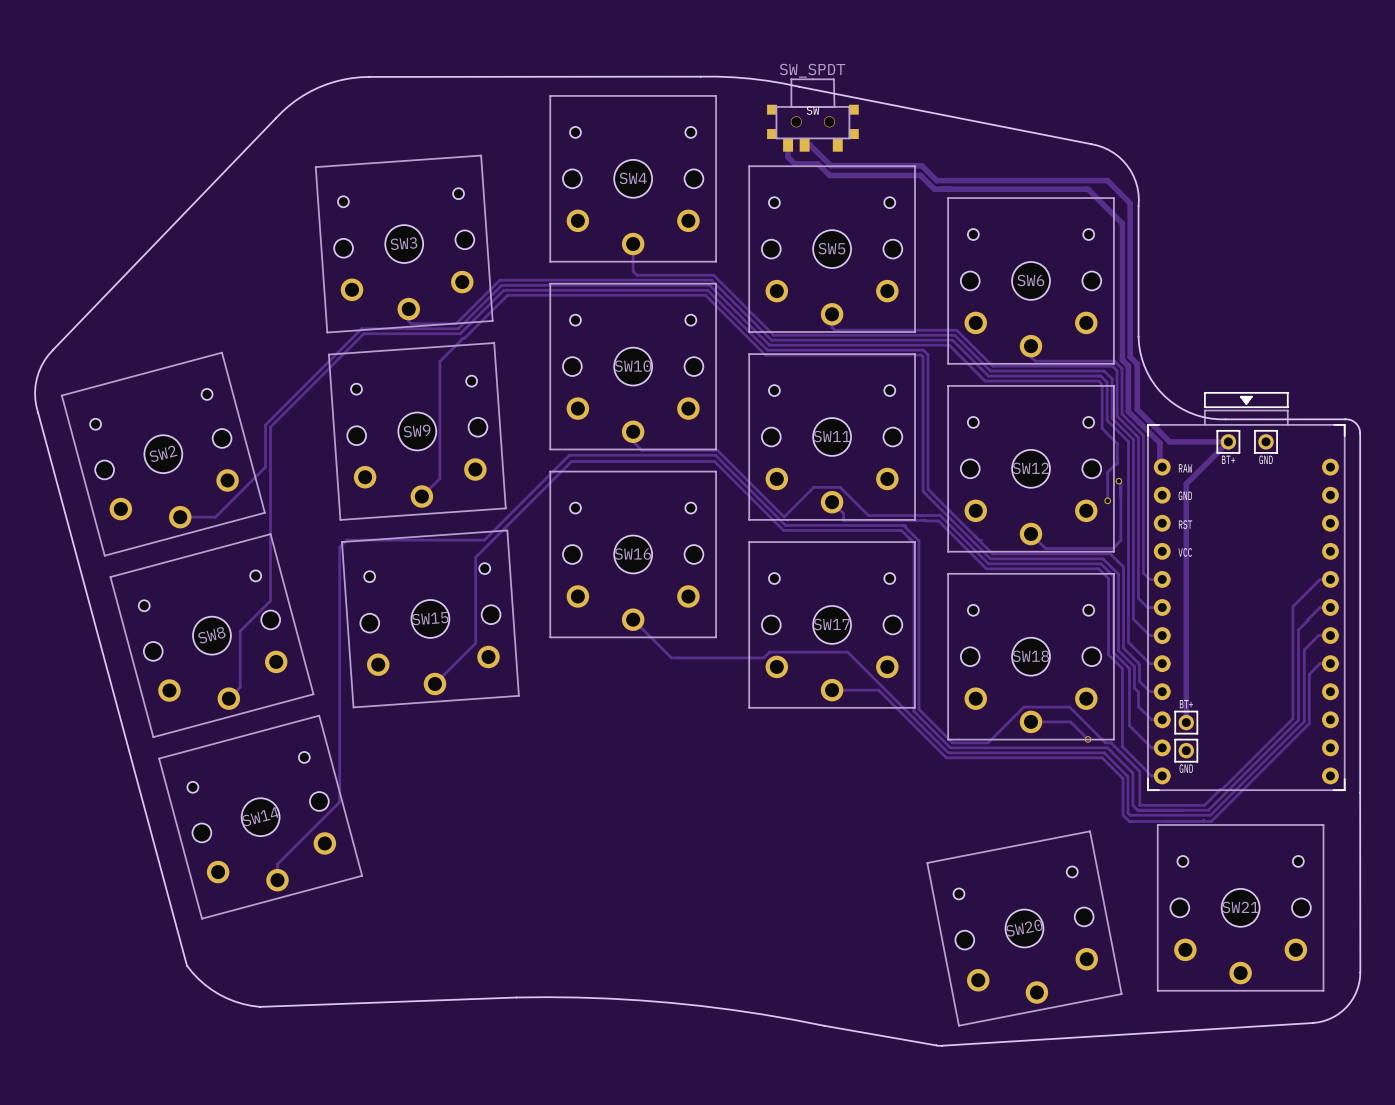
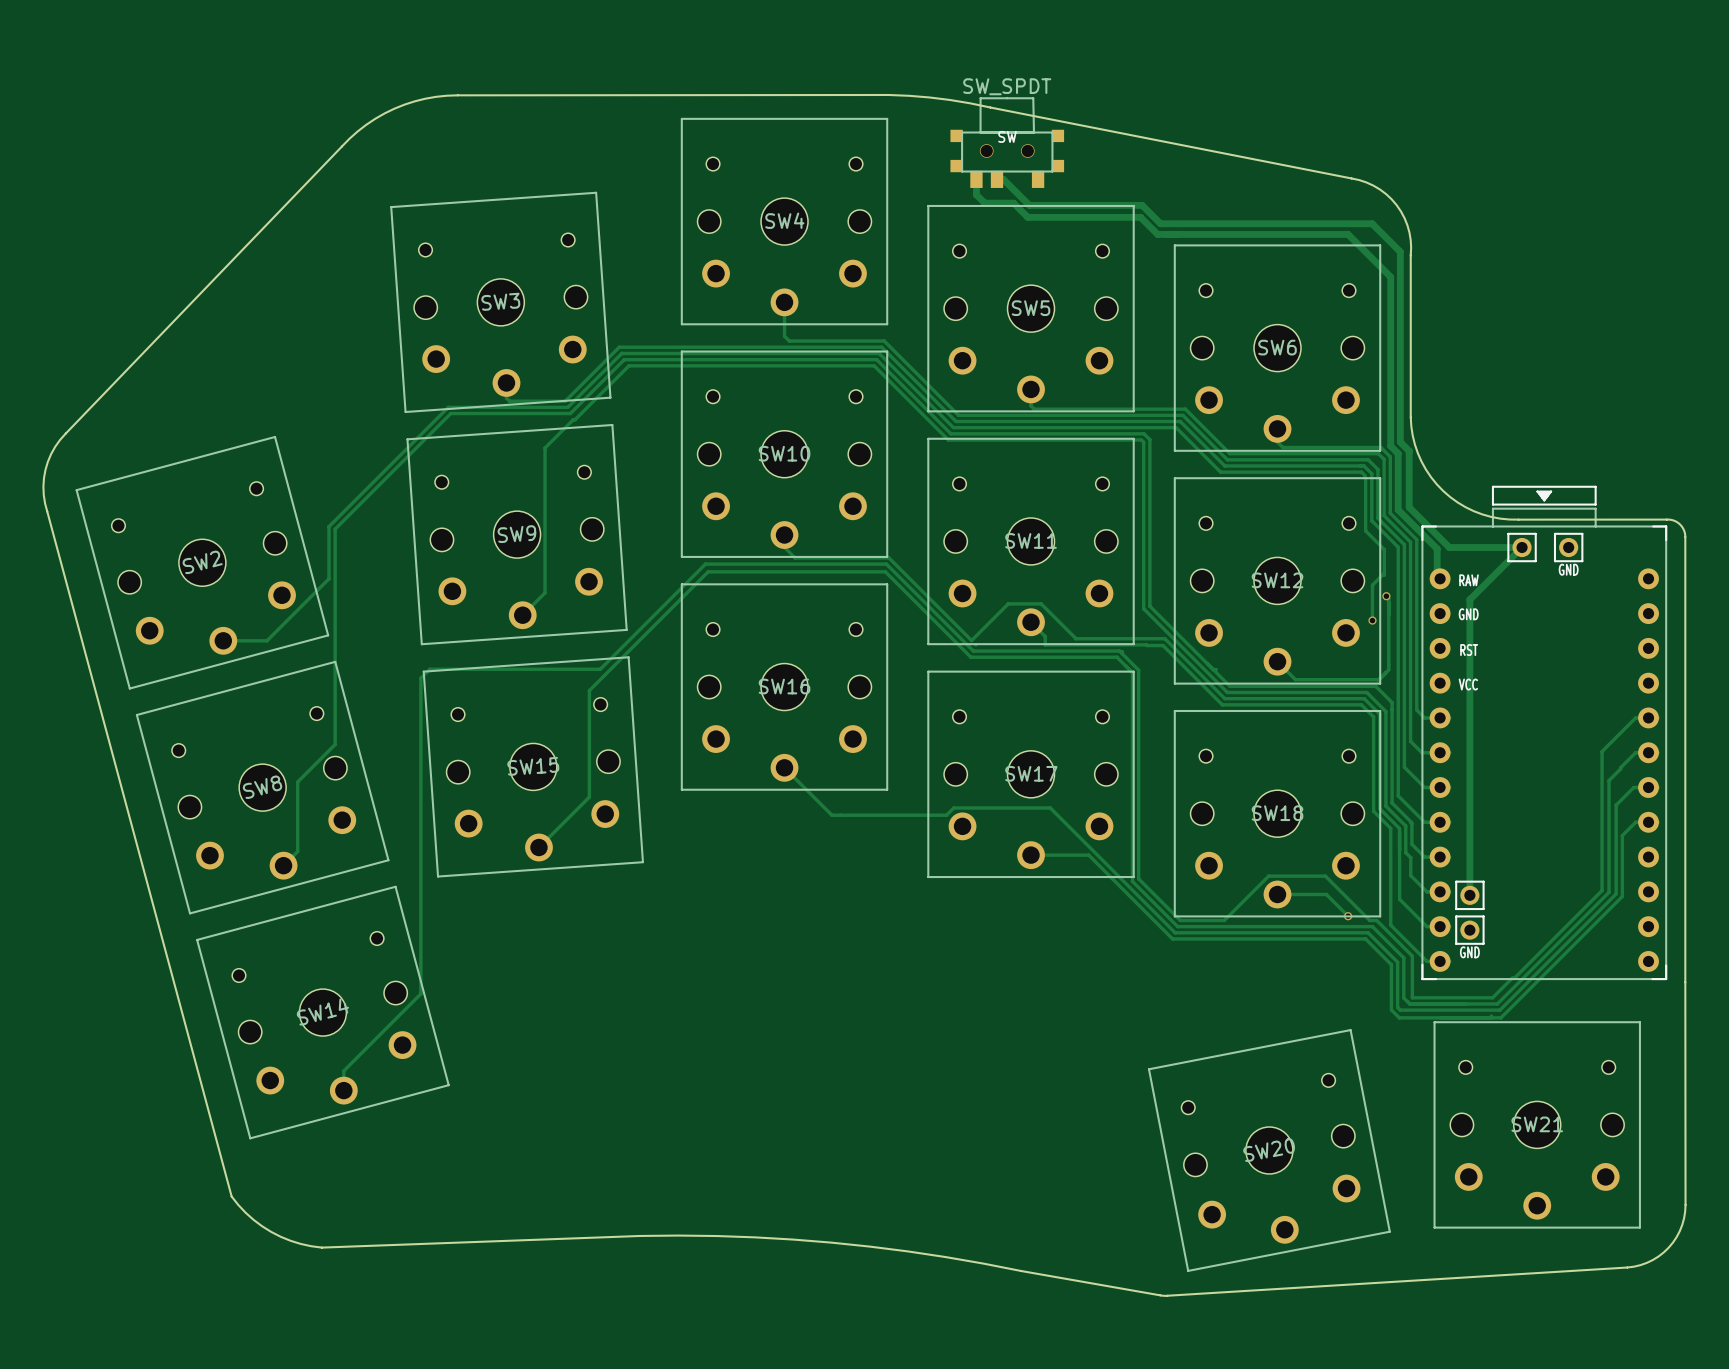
drawing: [1221, 455, 1236, 464] -> none
drawing: [1179, 700, 1193, 709] -> none

